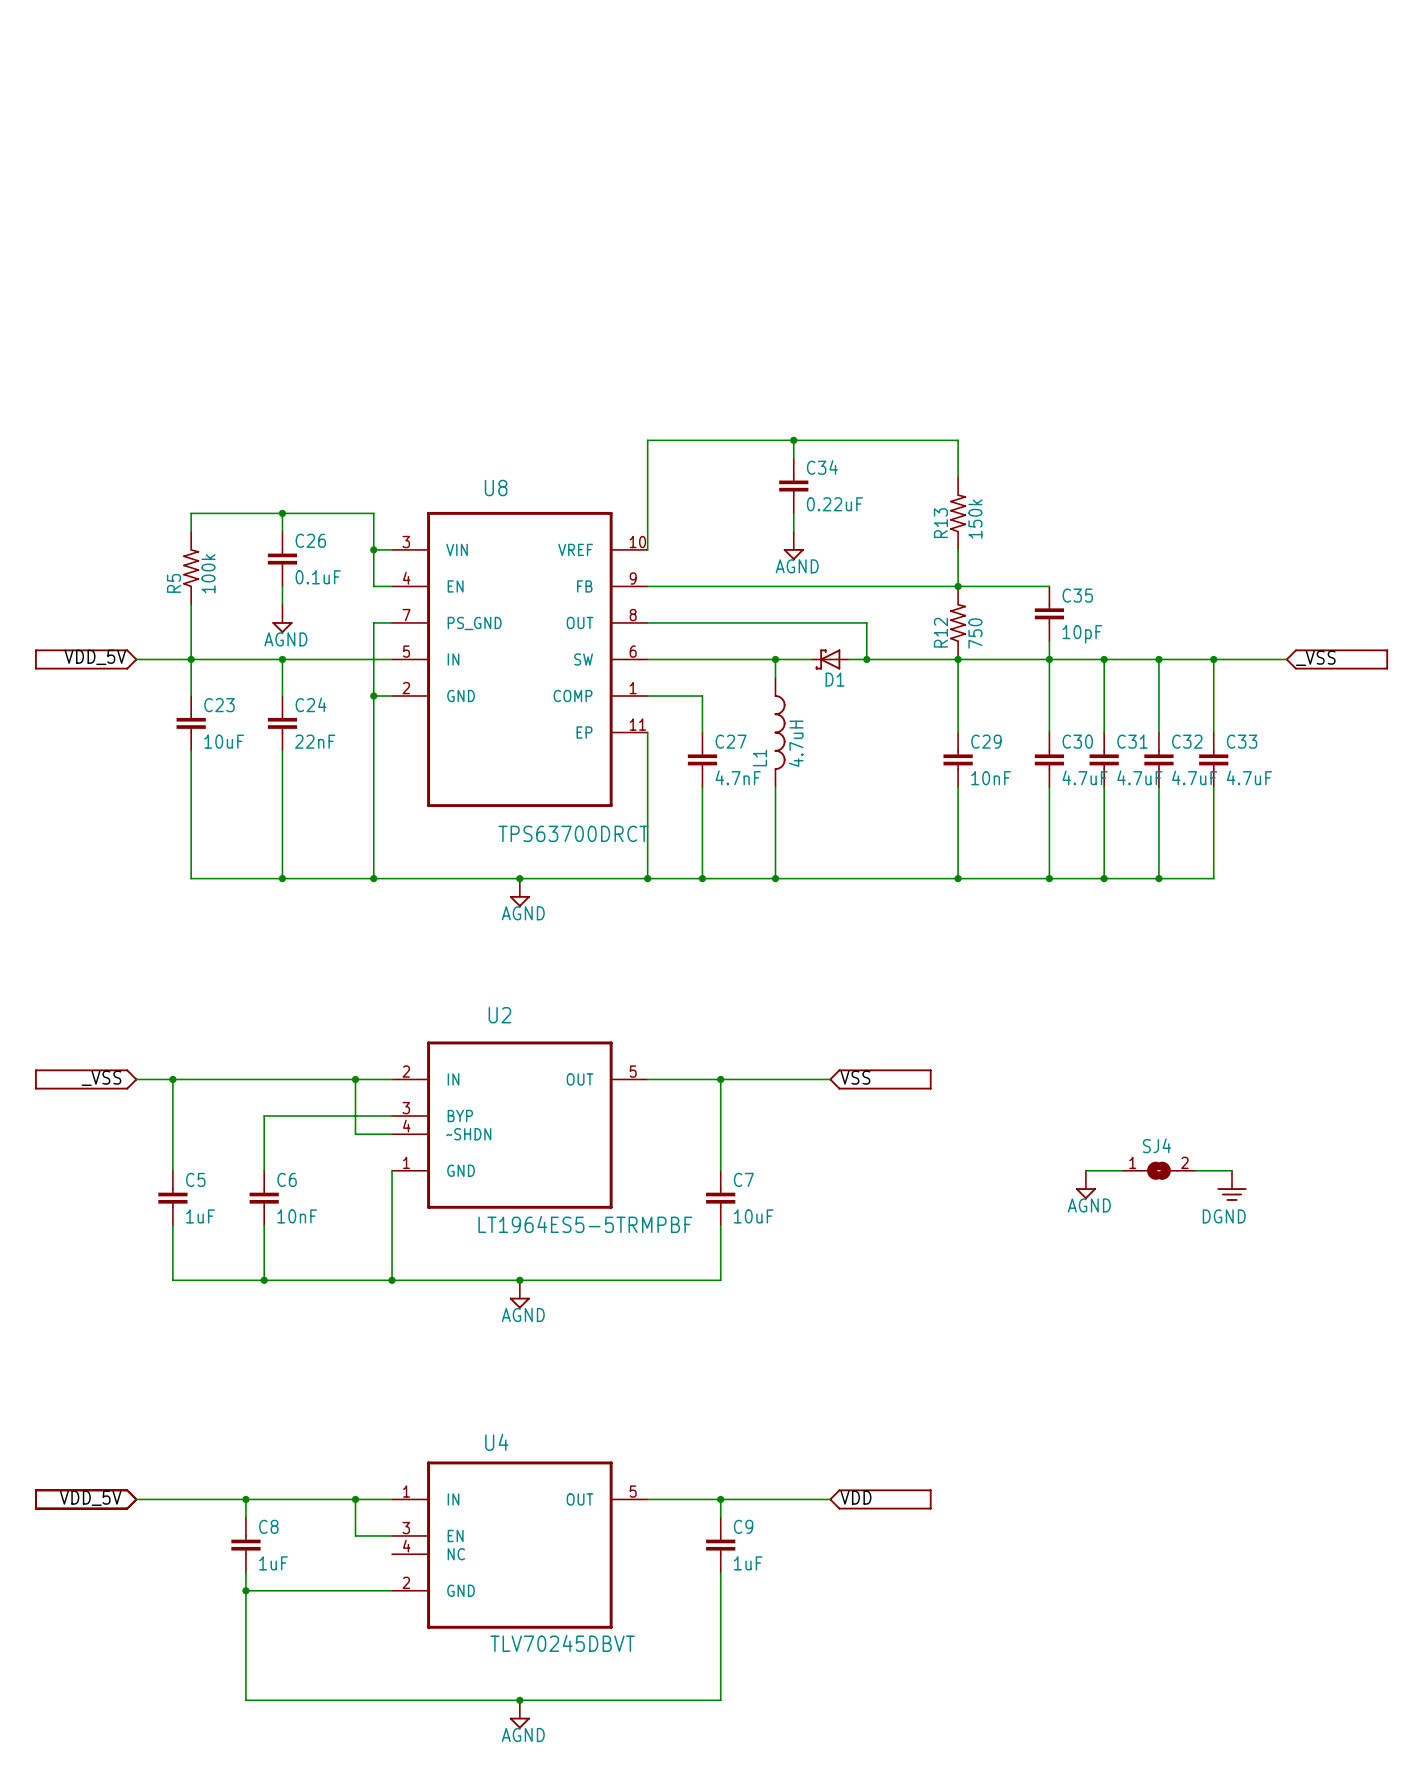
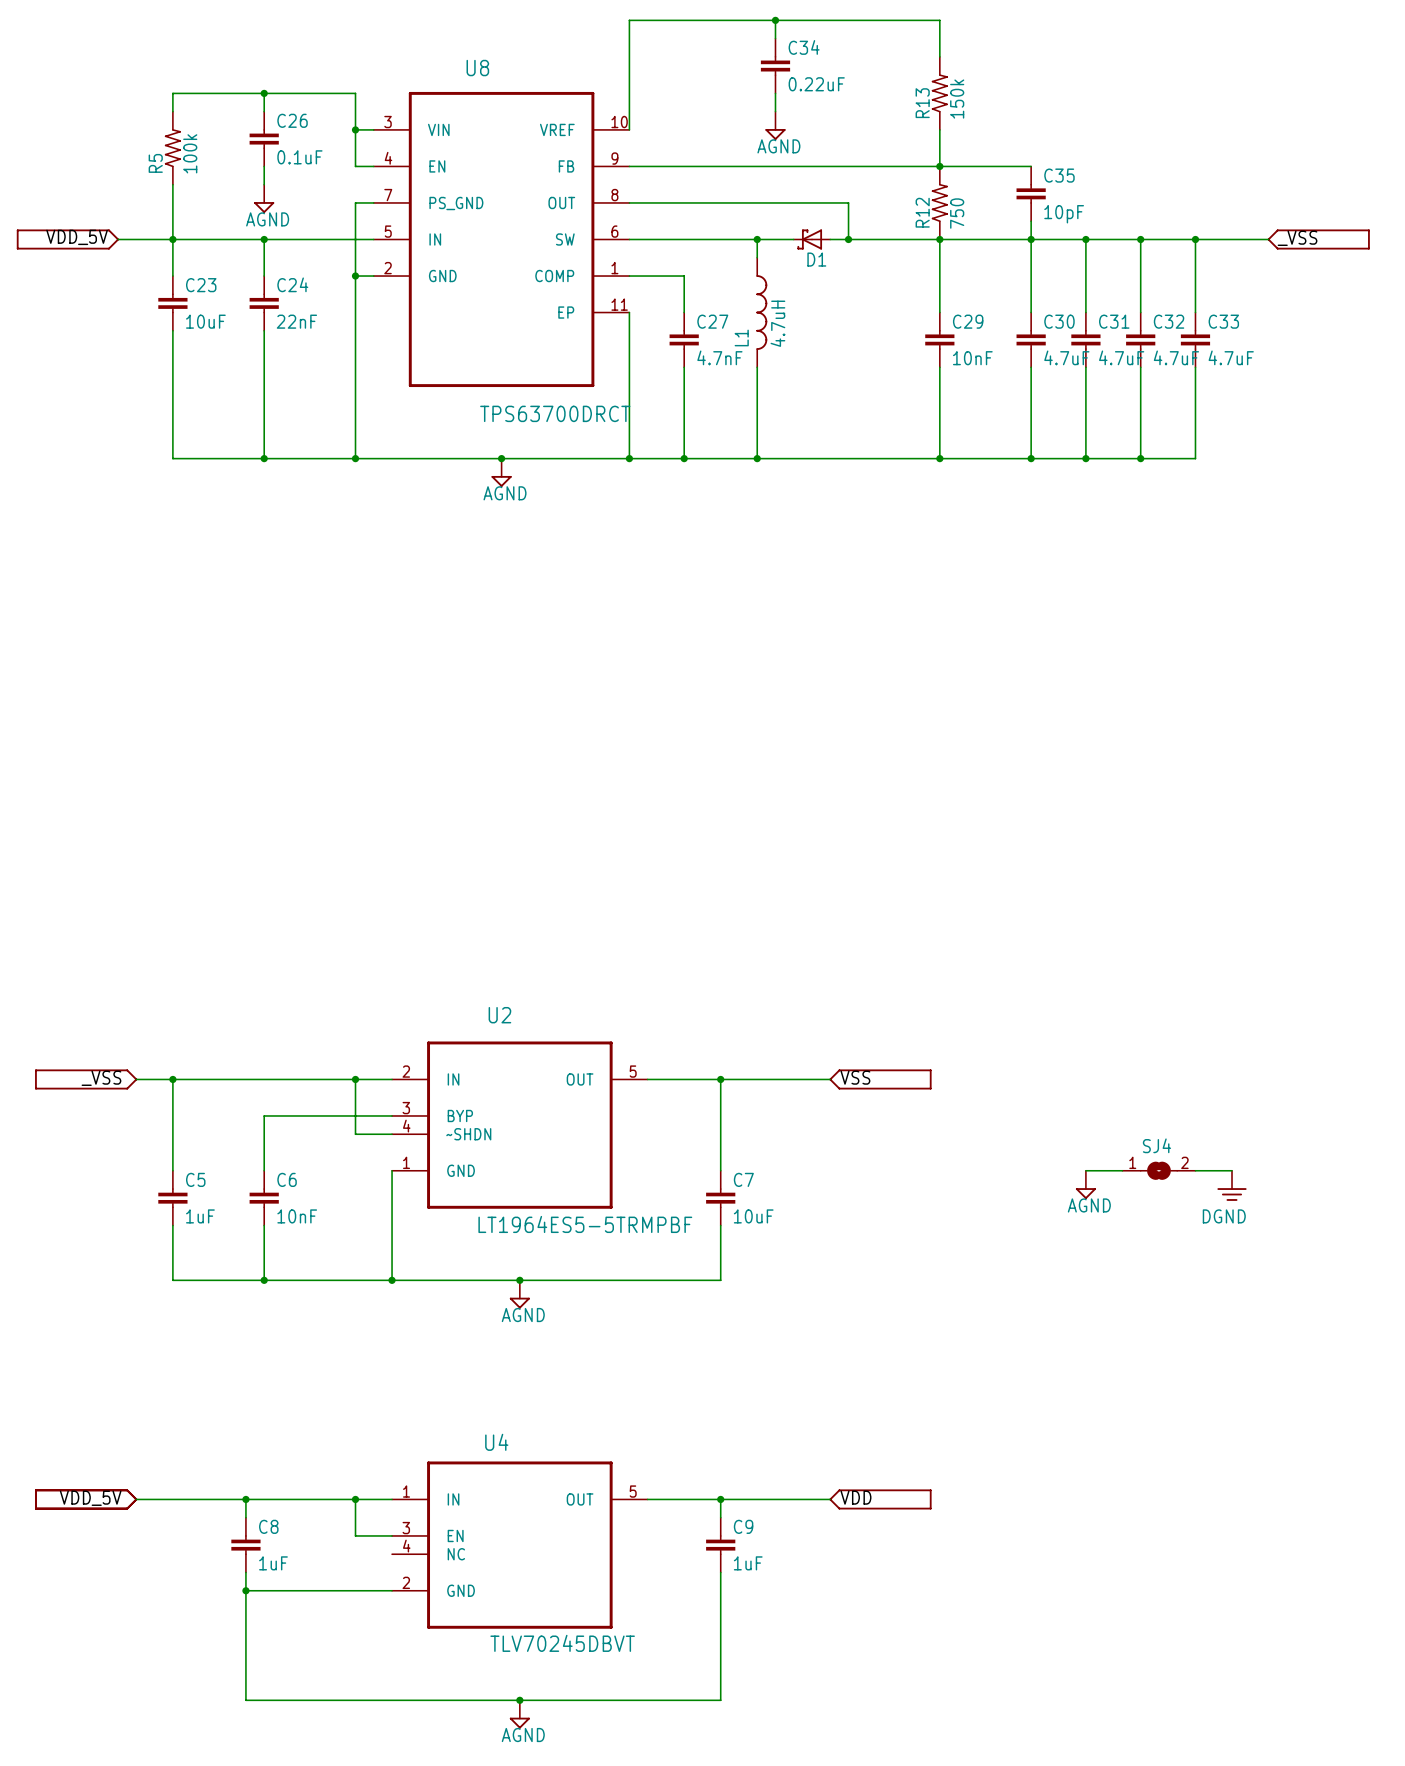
wire: none -> (775, 20) (775, 38)
junction: none -> (775, 20)
wire: none -> (939, 56) (939, 20) (629, 20) (629, 129)
wire: none -> (264, 93) (264, 111)
junction: none -> (264, 93)
wire: none -> (775, 93) (775, 111)
wire: none -> (172, 111) (172, 93) (355, 93) (355, 166) (373, 166)
power symbol: none -> AGND (775, 125)
wire: none -> (355, 129) (373, 129)
junction: none -> (355, 129)
wire: none -> (939, 129) (939, 166)
wire: none -> (264, 166) (264, 184)
wire: none -> (629, 166) (1031, 166)
junction: none -> (939, 166)
wire: none -> (172, 184) (172, 276)
power symbol: none -> AGND (264, 198)
wire: none -> (373, 202) (355, 202) (355, 458)
wire: none -> (629, 202) (848, 202) (848, 239)
wire: none -> (1031, 221) (1031, 312)
label: none -> VDD_5V (77, 237)
label: none -> _VSS (1297, 238)
part: none -> (67, 239)
wire: none -> (118, 239) (373, 239)
junction: none -> (172, 239)
wire: none -> (264, 239) (264, 276)
junction: none -> (264, 239)
wire: none -> (629, 239) (793, 239)
wire: none -> (757, 239) (757, 257)
junction: none -> (757, 239)
wire: none -> (830, 239) (1268, 239)
junction: none -> (848, 239)
wire: none -> (939, 239) (939, 312)
junction: none -> (939, 239)
junction: none -> (1031, 239)
wire: none -> (1085, 239) (1085, 312)
junction: none -> (1085, 239)
wire: none -> (1140, 239) (1140, 312)
junction: none -> (1140, 239)
wire: none -> (1195, 239) (1195, 312)
junction: none -> (1195, 239)
part: none -> (1318, 239)
wire: none -> (355, 276) (373, 276)
junction: none -> (355, 276)
wire: none -> (629, 276) (684, 276) (684, 312)
wire: none -> (629, 312) (629, 458)
wire: none -> (172, 330) (172, 458) (1195, 458) (1195, 367)
wire: none -> (264, 330) (264, 458)
wire: none -> (684, 367) (684, 458)
wire: none -> (757, 367) (757, 458)
wire: none -> (939, 367) (939, 458)
wire: none -> (1031, 367) (1031, 458)
wire: none -> (1085, 367) (1085, 458)
wire: none -> (1140, 367) (1140, 458)
wire: (793, 440) (793, 458) -> none
junction position: (793, 440) -> (757, 458)
junction: none -> (264, 458)
junction: none -> (355, 458)
junction: none -> (501, 458)
junction: none -> (629, 458)
junction: none -> (684, 458)
junction: none -> (939, 458)
junction: none -> (1031, 458)
junction: none -> (1085, 458)
junction: none -> (1140, 458)
power symbol: none -> AGND (501, 472)
wire: (958, 476) (958, 440) (647, 440) (647, 549) -> none
C34 position: (793, 486) -> (775, 66)
wire: (282, 513) (282, 531) -> none
junction: (282, 513) -> none
wire: (793, 513) (793, 531) -> none
R13 position: (958, 513) -> (939, 93)
wire: (191, 531) (191, 513) (373, 513) (373, 586) (392, 586) -> none
power symbol: AGND (793, 545) -> none
wire: (373, 549) (392, 549) -> none
junction: (373, 549) -> none
wire: (958, 549) (958, 586) -> none
C26 position: (282, 559) -> (264, 139)
R5 position: (191, 568) -> (172, 148)
wire: (282, 586) (282, 604) -> none
wire: (647, 586) (1049, 586) -> none
junction: (958, 586) -> none
wire: (191, 604) (191, 696) -> none
C35 position: (1049, 613) -> (1031, 193)
power symbol: AGND (282, 618) -> none
wire: (392, 622) (373, 622) (373, 878) -> none
wire: (647, 622) (866, 622) (866, 659) -> none
R12 position: (958, 622) -> (939, 202)
wire: (1049, 641) (1049, 732) -> none
label: VDD_5V (95, 657) -> none
label: _VSS (1315, 658) -> none
part: (86, 659) -> none
wire: (136, 659) (392, 659) -> none
junction: (191, 659) -> none
wire: (282, 659) (282, 696) -> none
junction: (282, 659) -> none
U8 position: (519, 659) -> (501, 239)
wire: (647, 659) (812, 659) -> none
wire: (775, 659) (775, 677) -> none
junction: (775, 659) -> none
D1 position: (830, 659) -> (812, 239)
wire: (848, 659) (1286, 659) -> none
junction: (866, 659) -> none
wire: (958, 659) (958, 732) -> none
junction: (958, 659) -> none
junction: (1049, 659) -> none
wire: (1104, 659) (1104, 732) -> none
junction: (1104, 659) -> none
wire: (1158, 659) (1158, 732) -> none
junction: (1158, 659) -> none
wire: (1213, 659) (1213, 732) -> none
junction: (1213, 659) -> none
part: (1336, 659) -> none
wire: (373, 696) (392, 696) -> none
junction: (373, 696) -> none
wire: (647, 696) (702, 696) (702, 732) -> none
C23 position: (191, 723) -> (172, 303)
C24 position: (282, 723) -> (264, 303)
wire: (647, 732) (647, 878) -> none
L1 position: (780, 732) -> (761, 312)
wire: (191, 750) (191, 878) (1213, 878) (1213, 787) -> none
wire: (282, 750) (282, 878) -> none
C27 position: (702, 759) -> (684, 339)
C29 position: (958, 759) -> (939, 339)
C30 position: (1049, 759) -> (1031, 339)
C31 position: (1104, 759) -> (1085, 339)
C32 position: (1158, 759) -> (1140, 339)
C33 position: (1213, 759) -> (1195, 339)
wire: (702, 787) (702, 878) -> none
wire: (775, 787) (775, 878) -> none
wire: (958, 787) (958, 878) -> none
wire: (1049, 787) (1049, 878) -> none
wire: (1104, 787) (1104, 878) -> none
wire: (1158, 787) (1158, 878) -> none
junction: (282, 878) -> none
junction: (373, 878) -> none
junction: (519, 878) -> none
junction: (647, 878) -> none
junction: (702, 878) -> none
junction: (775, 878) -> none
junction: (958, 878) -> none
junction: (1049, 878) -> none
junction: (1104, 878) -> none
junction: (1158, 878) -> none
power symbol: AGND (519, 892) -> none

